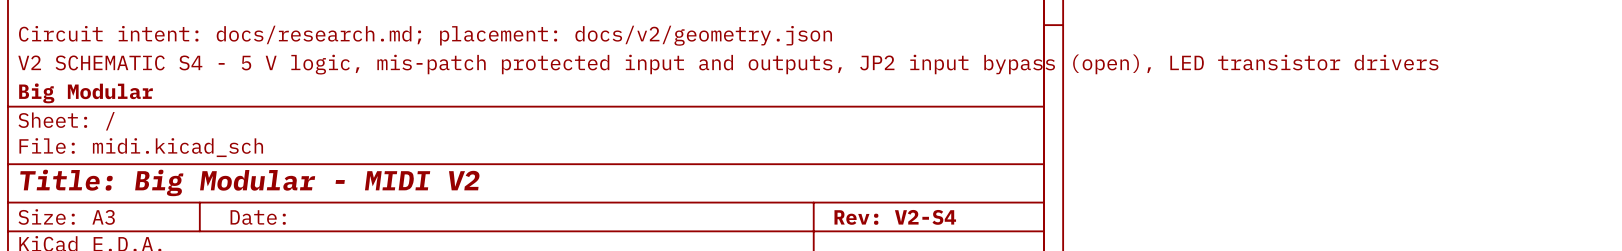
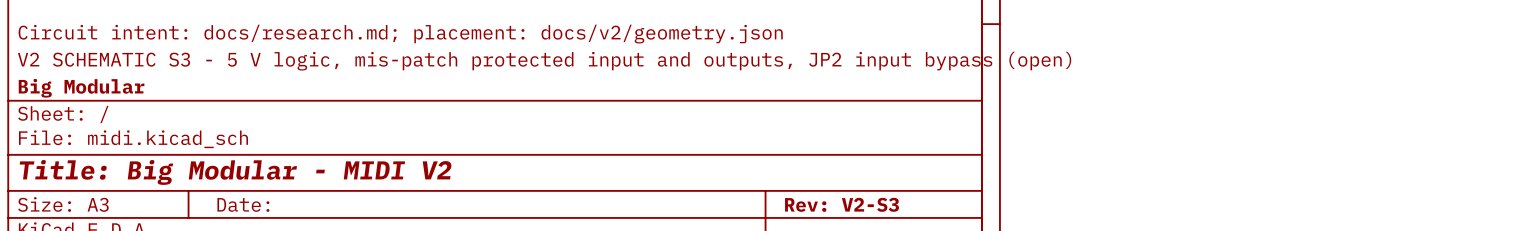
title block: V2 SCHEMATIC S4 - 5 V logic, mis-patch protected input and outputs, JP2 input bypass (open), LED transistor drivers (728, 64) -> V2 SCHEMATIC S3 - 5 V logic, mis-patch protected input and outputs, JP2 input bypass (open) (544, 61)
title block: Rev: V2-S4 (895, 217) -> Rev: V2-S3 (842, 204)

